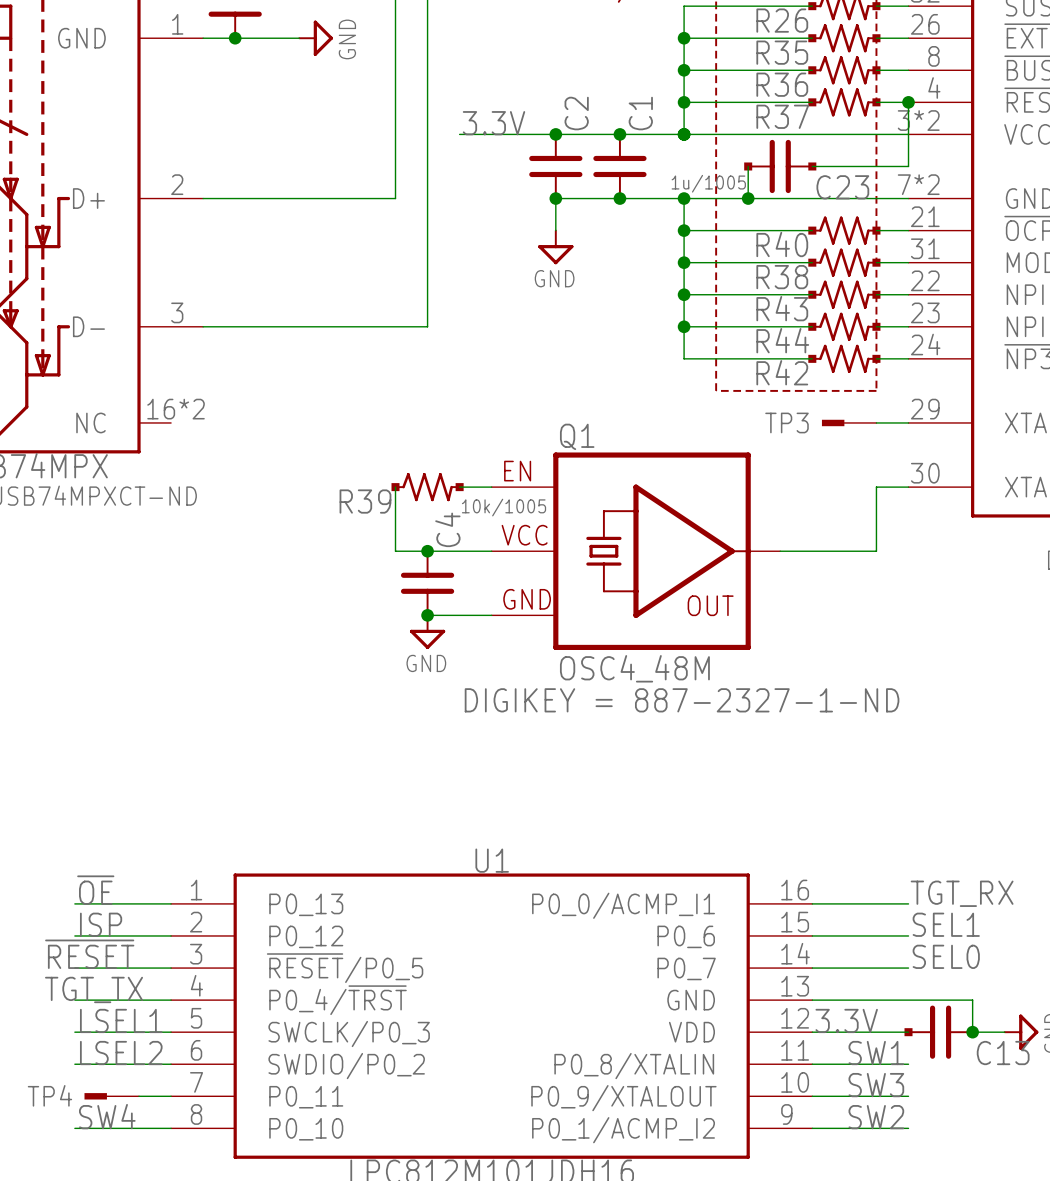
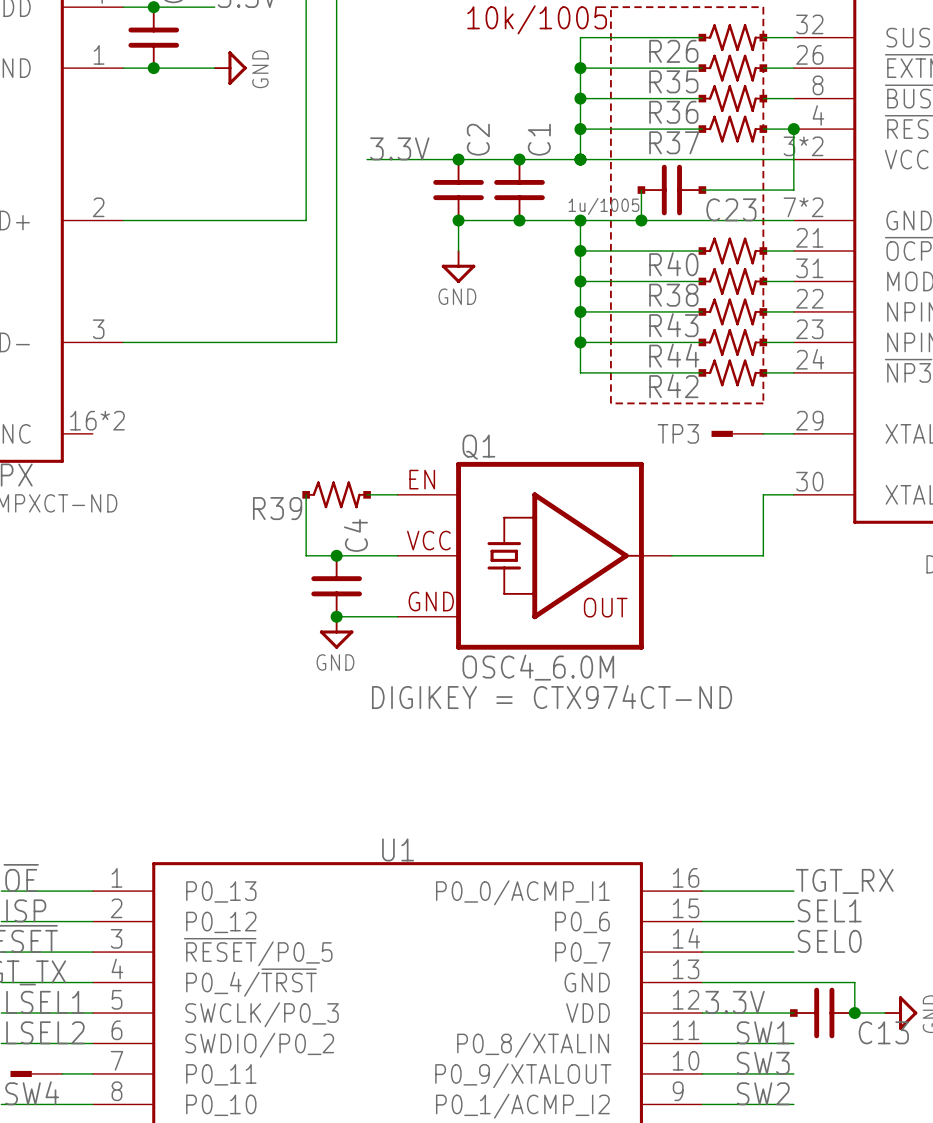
R39 value: 10k/1005 (504, 507) -> none
Q1 value: OSC4_48M (634, 668) -> OSC4_6.0M (538, 667)
Q1 text: DIGIKEY = 887-2327-1-ND (682, 700) -> DIGIKEY = CTX974CT-ND (552, 697)

